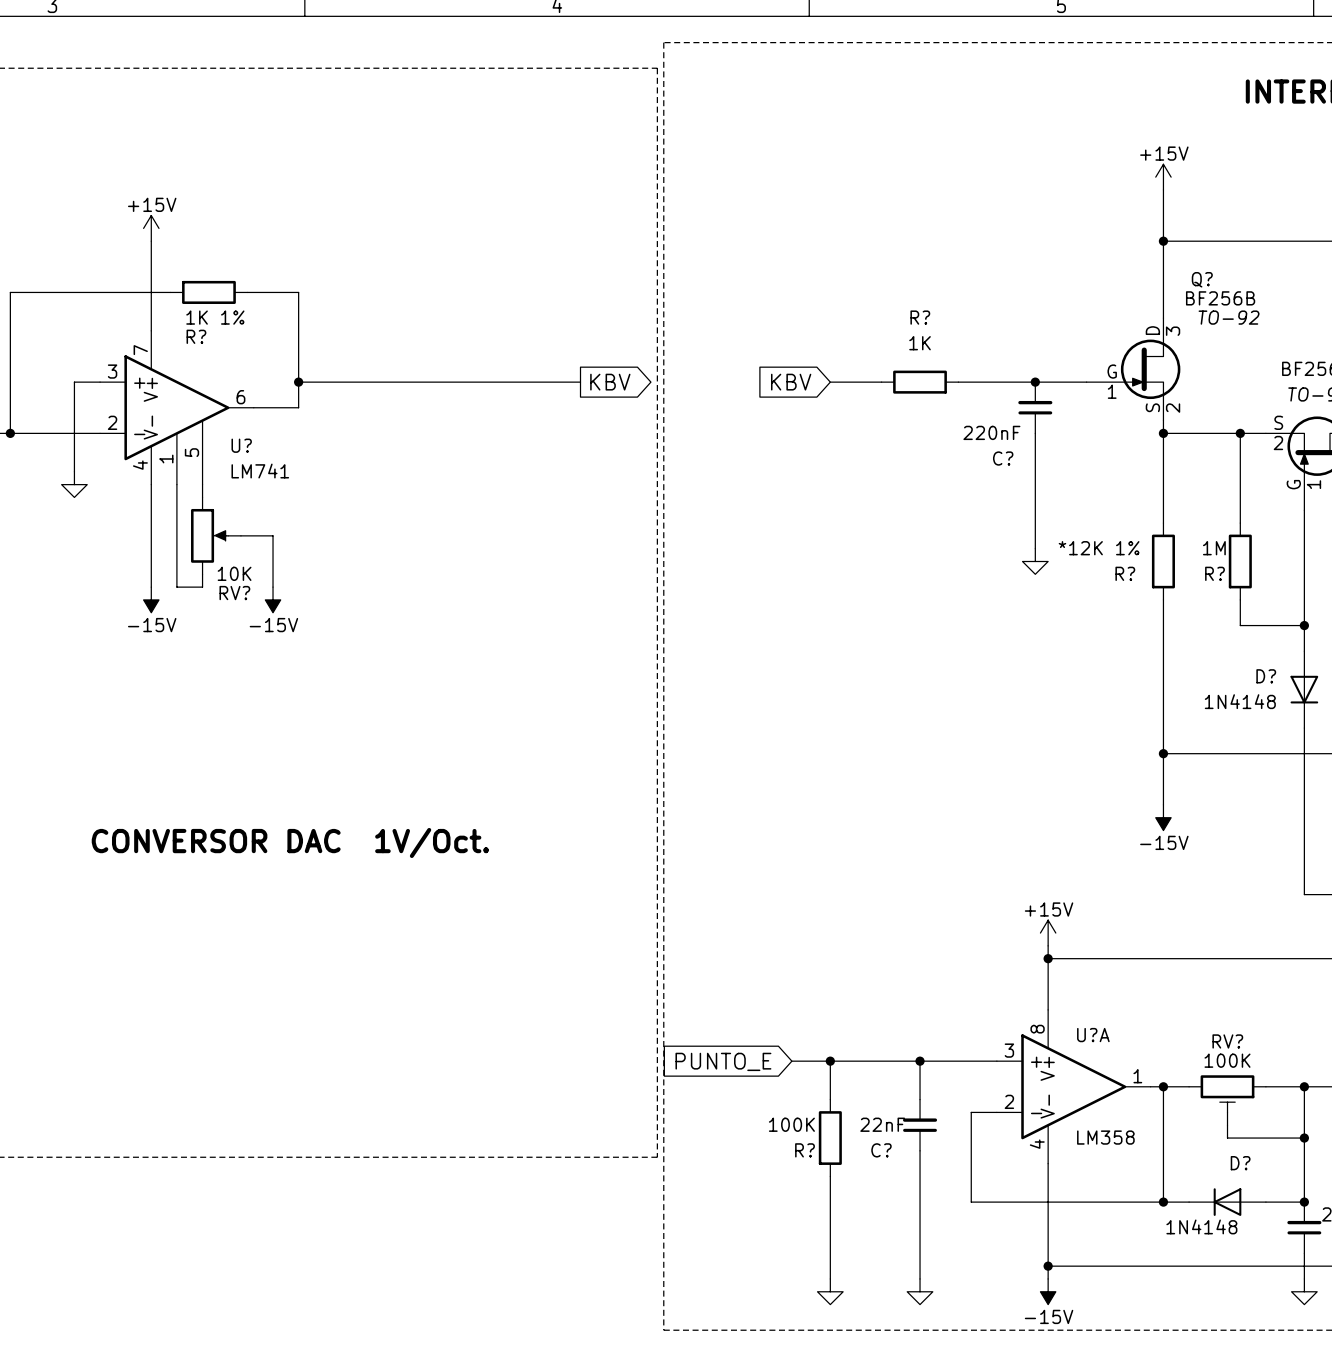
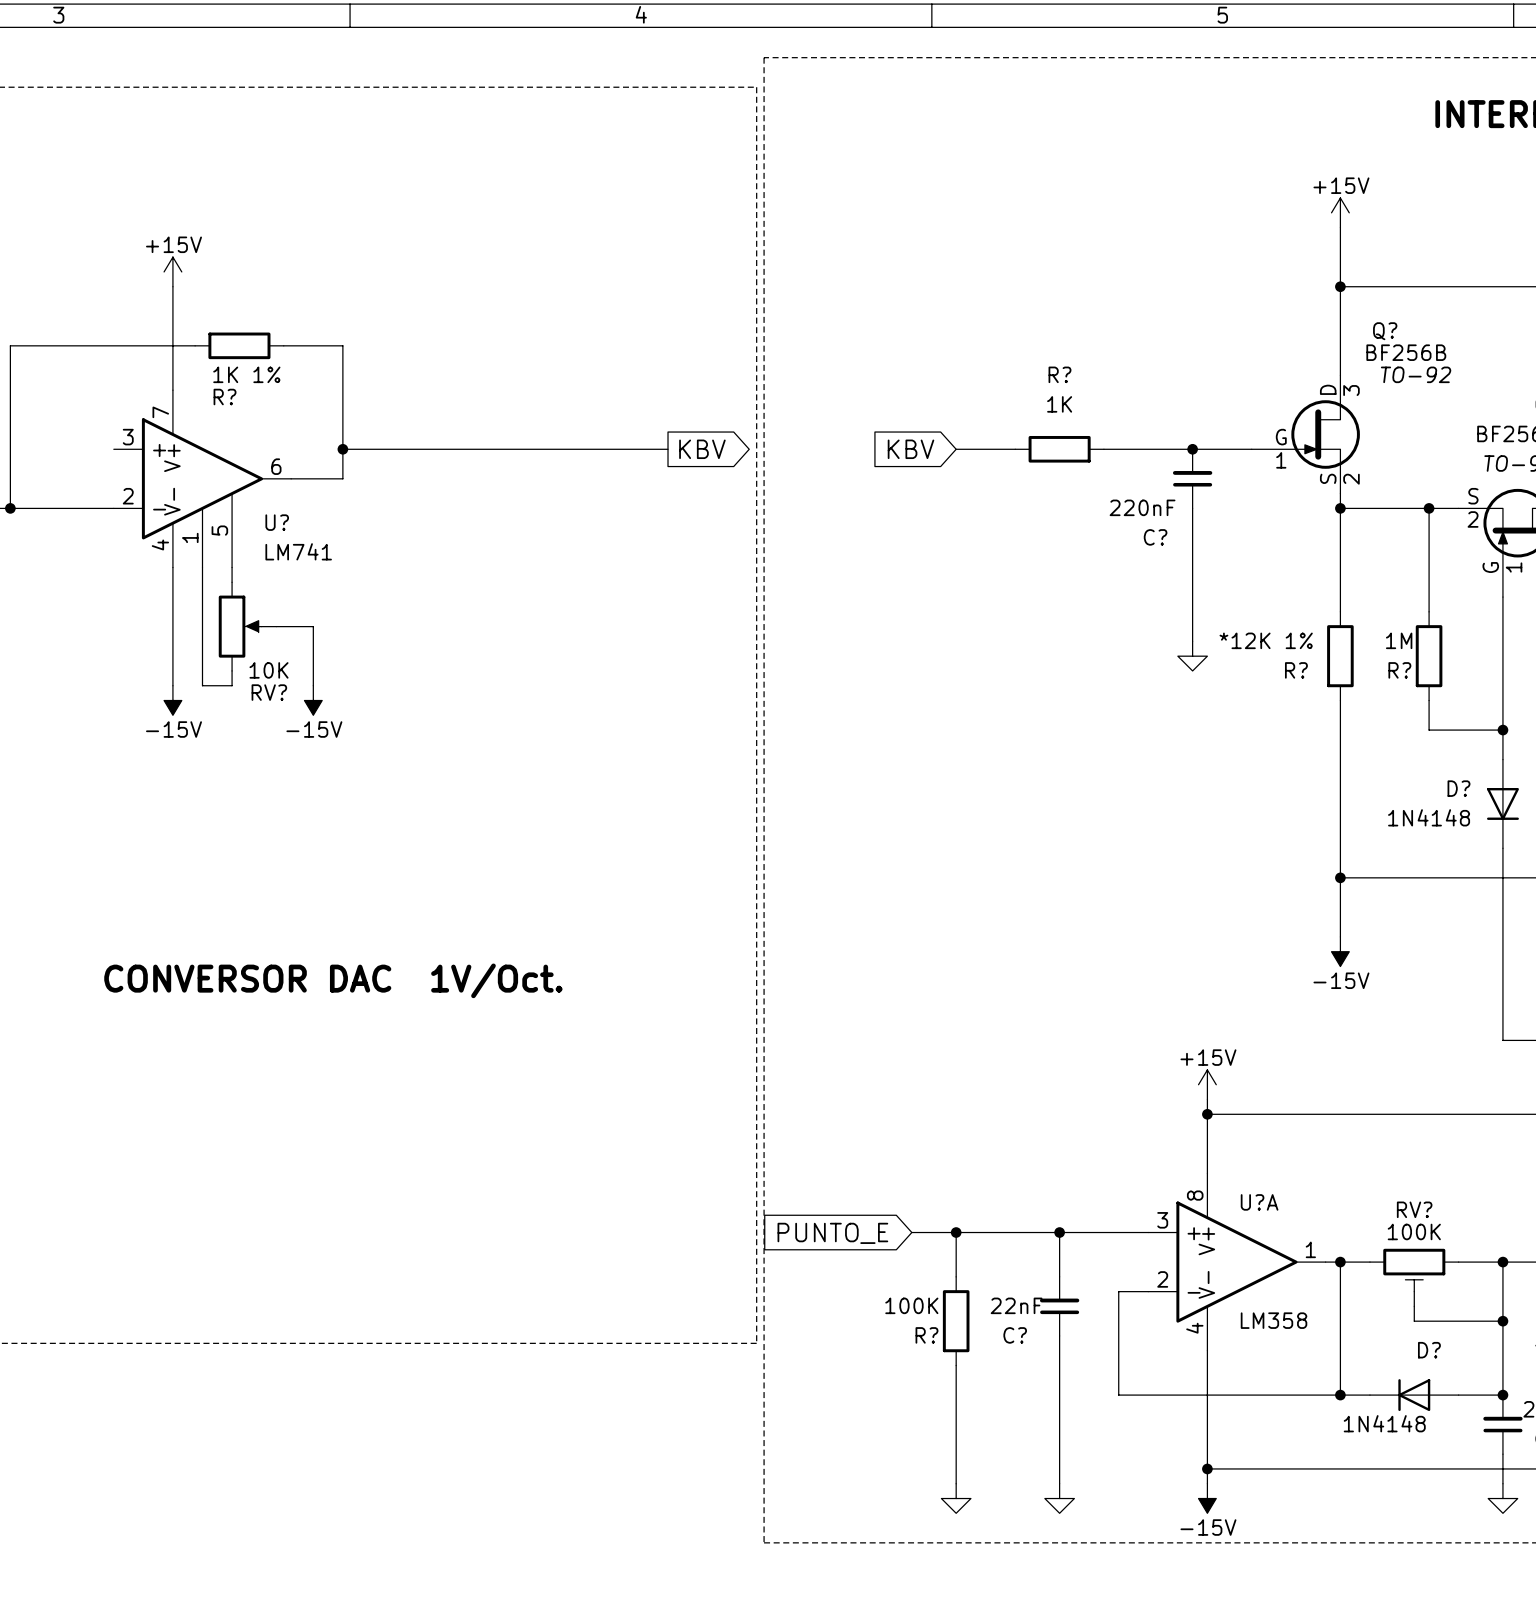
wire: (100, 382) (74, 382) (74, 471) -> none
power symbol: (74, 484) -> none

